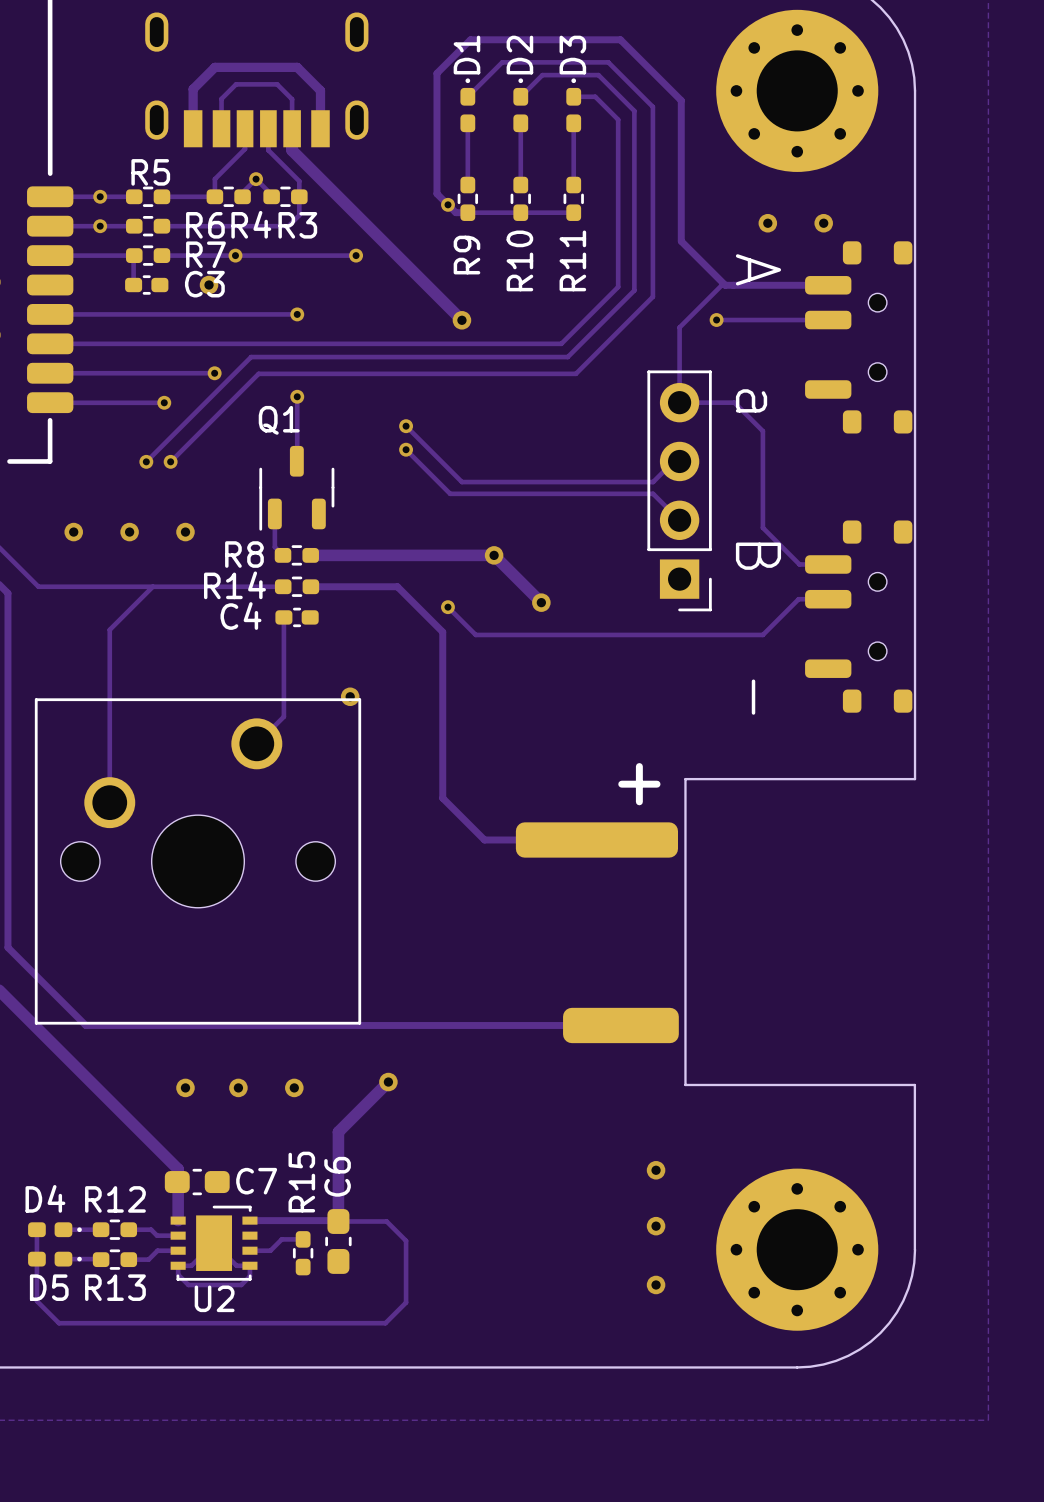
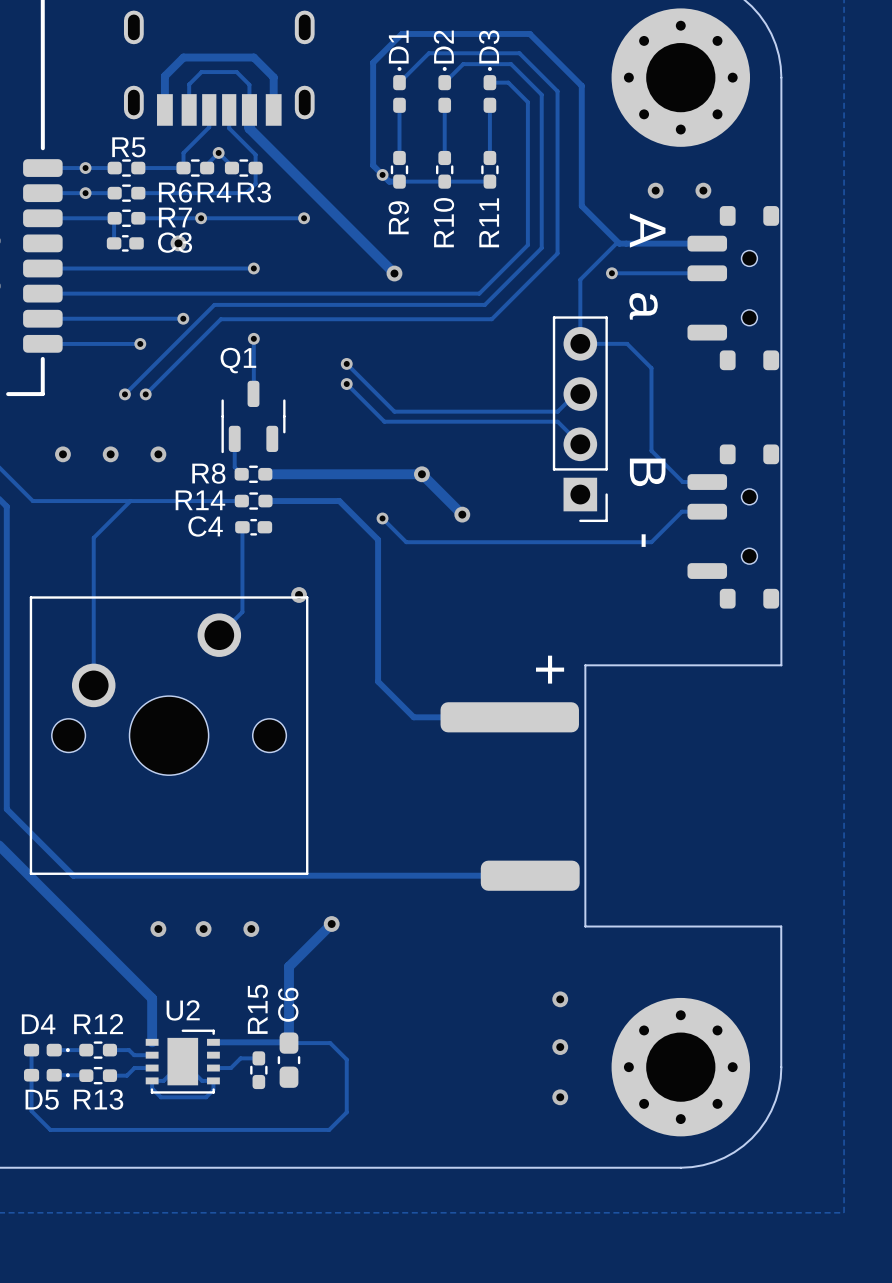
C7: (197, 1182) -> none
U2 name position: U2 (214, 1298) -> U2 (183, 1010)

